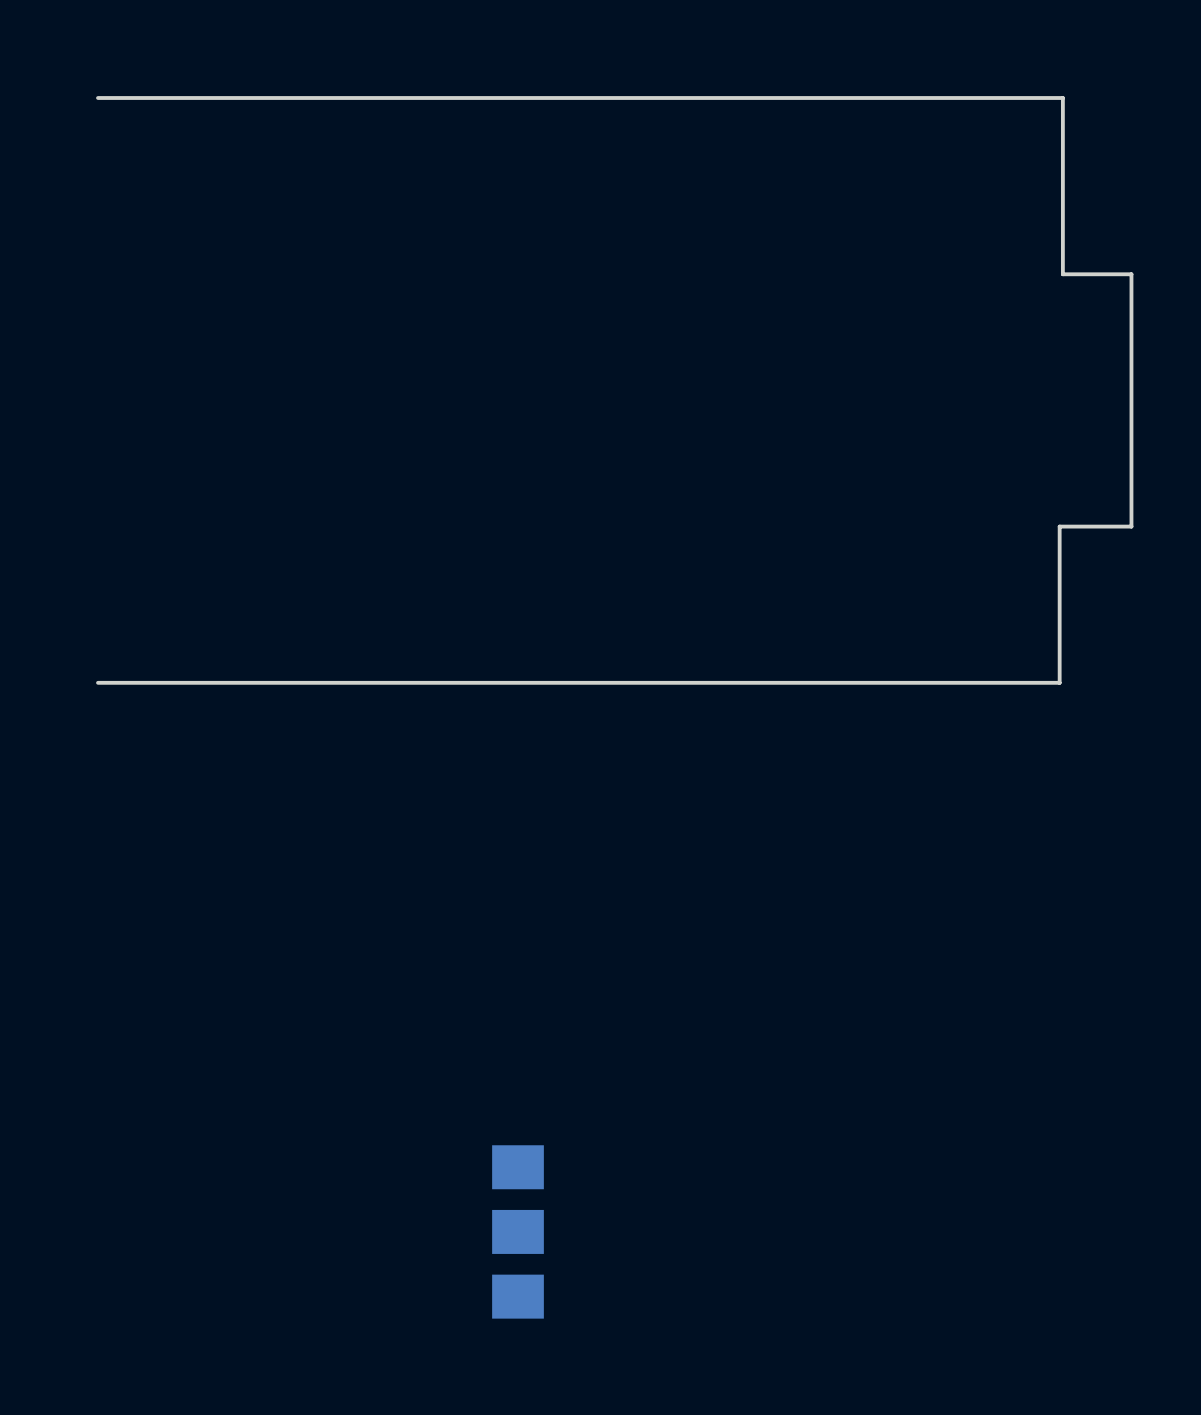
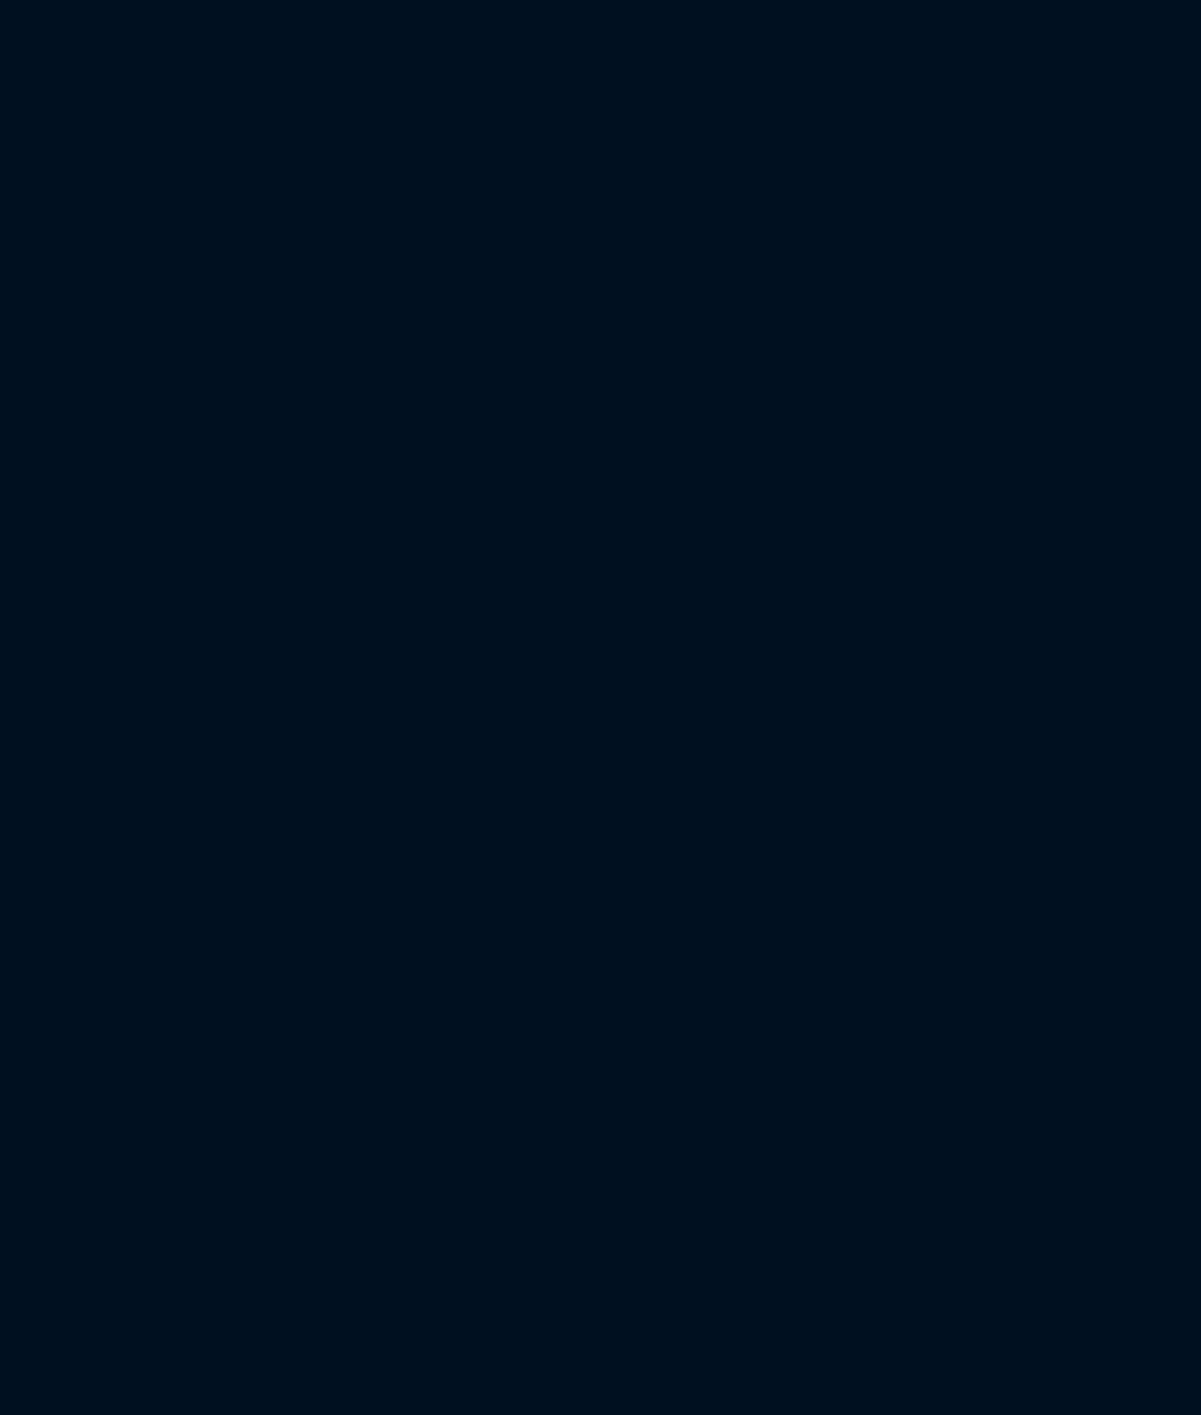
board edge: (97, 97) (1062, 97) (1062, 274) (1131, 274) (1131, 526) (1059, 526) (1059, 682) (97, 682) -> none
part: (518, 1231) -> none

